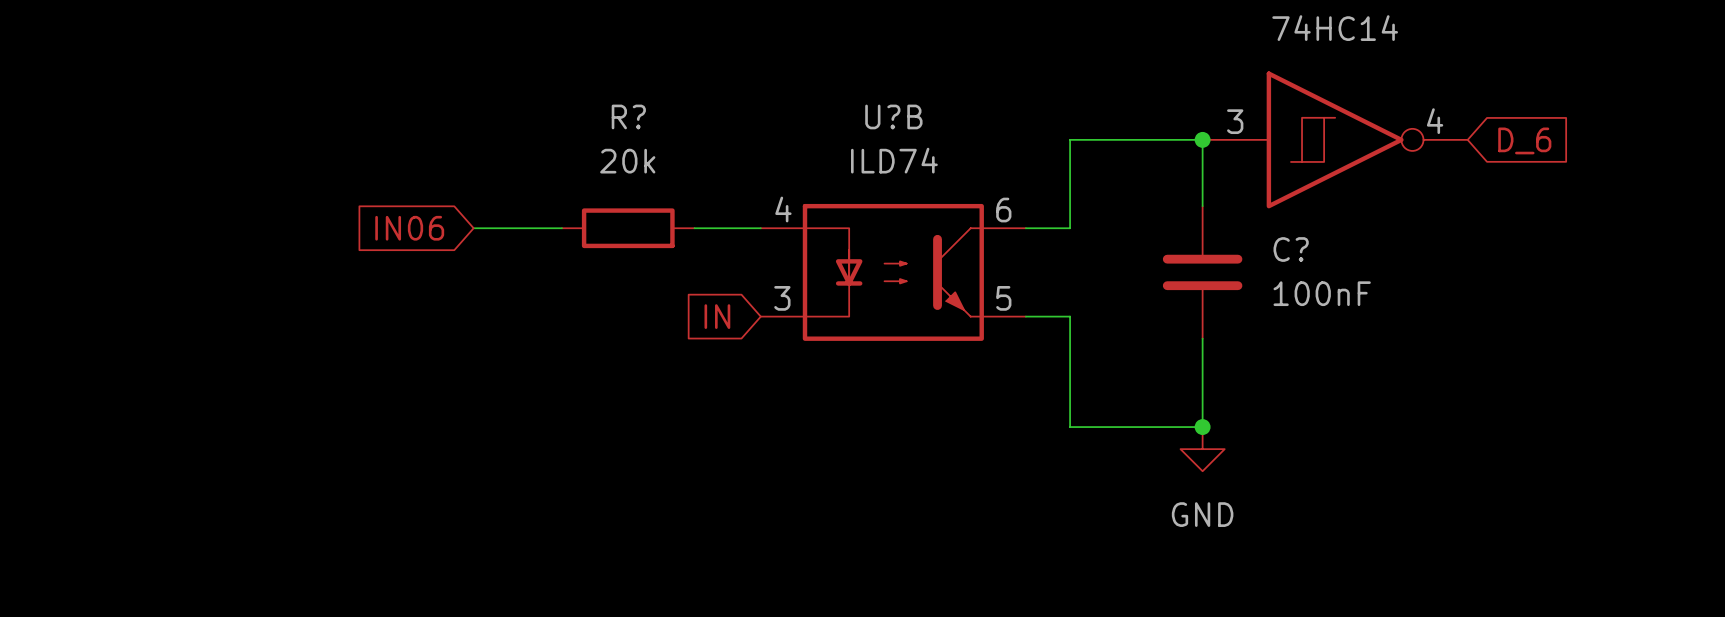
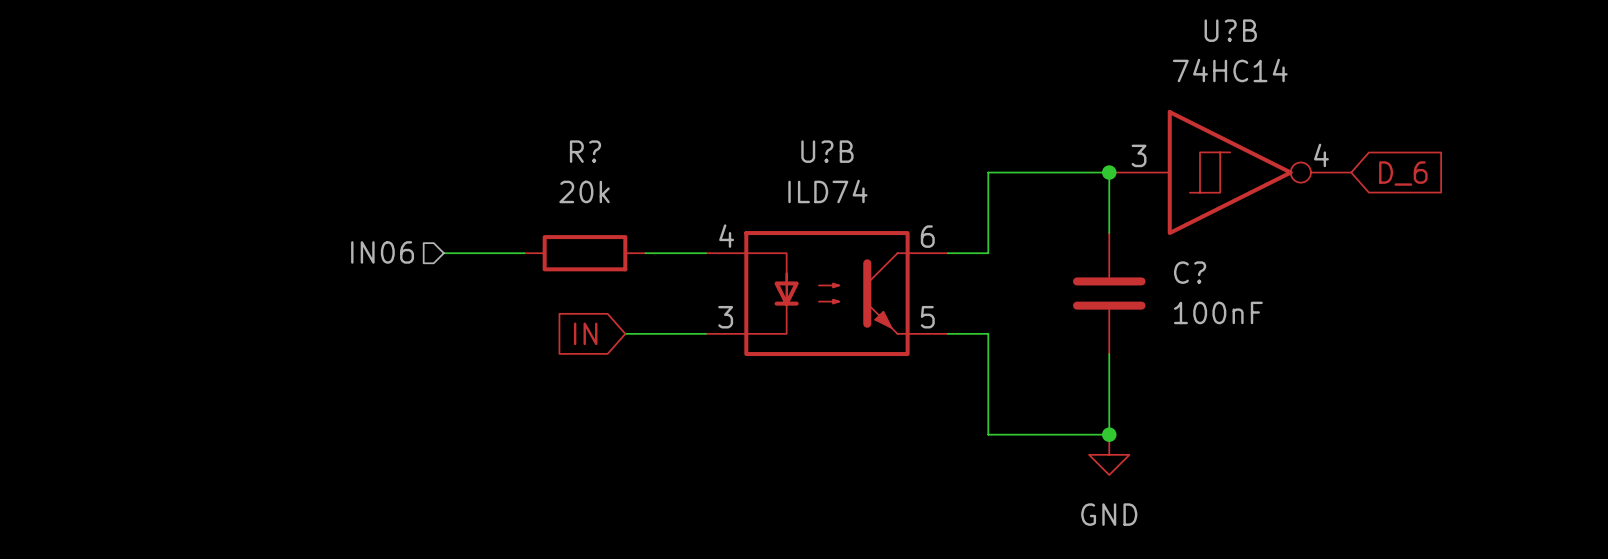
hierarchical label: none -> IN06 (382, 252)
global label: IN06 (409, 228) -> none
wire: none -> (625, 333) (705, 333)
global label position: IN (717, 316) -> IN (585, 333)

